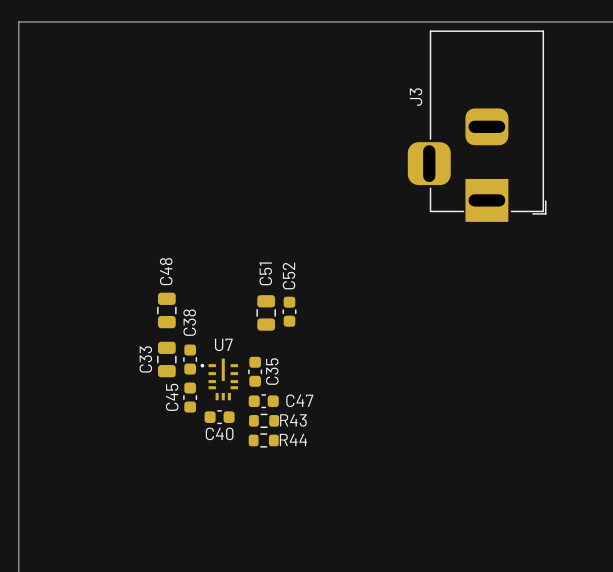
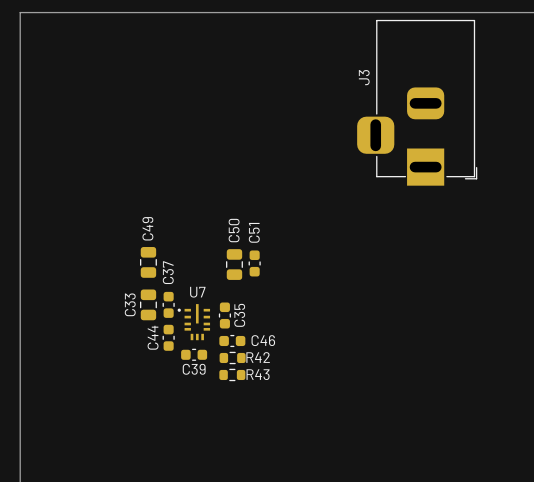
C48 name: C48 (166, 271) -> C49 (147, 228)
C51 name: C51 (265, 273) -> C50 (234, 230)
C52 name: C52 (289, 276) -> C51 (254, 232)
C38 name: C38 (189, 322) -> C37 (168, 272)
C45 name: C45 (172, 397) -> C44 (153, 337)
C47 name: C47 (299, 400) -> C46 (263, 340)
R43 name: R43 (293, 420) -> R42 (258, 357)
C40 name: C40 (219, 433) -> C39 (194, 369)
R44 name: R44 (293, 439) -> R43 (258, 374)

